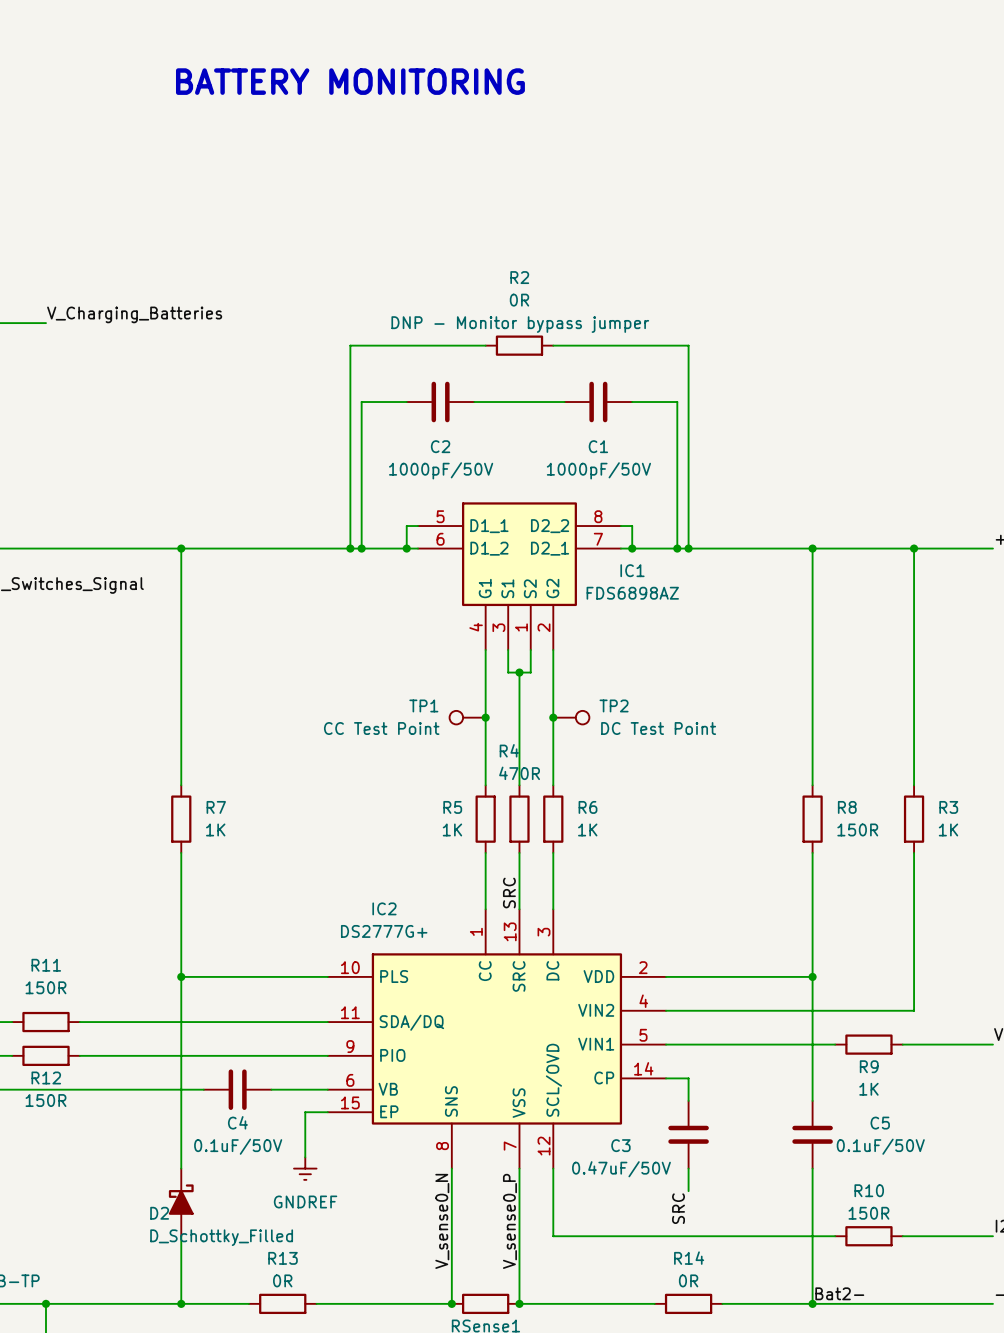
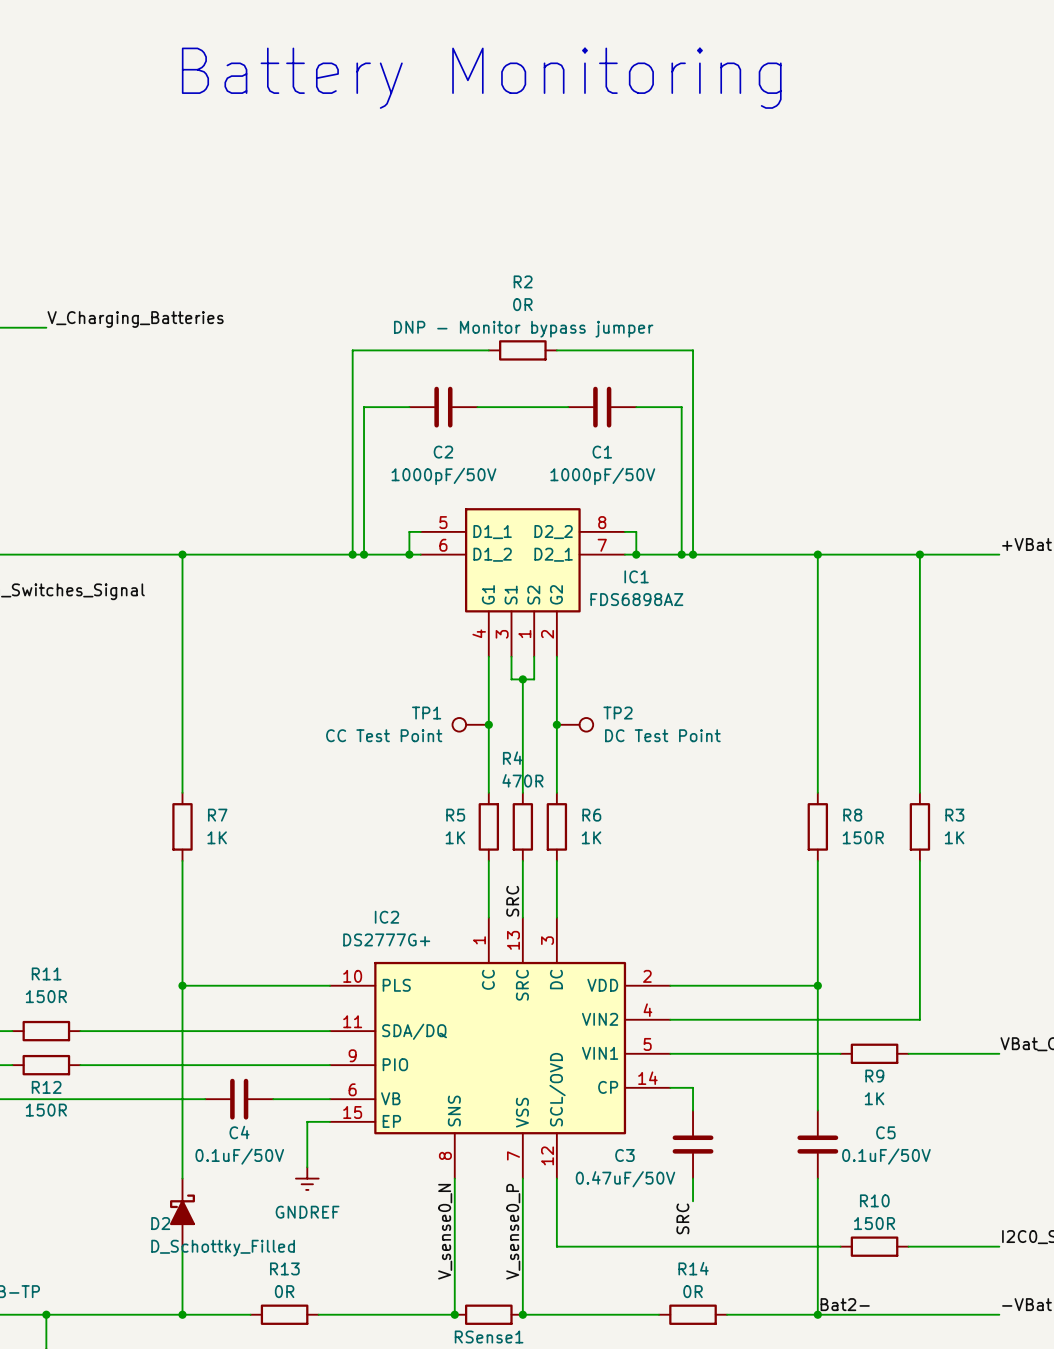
text: BATTERY MONITORING (350, 81) -> Battery Monitoring (481, 78)

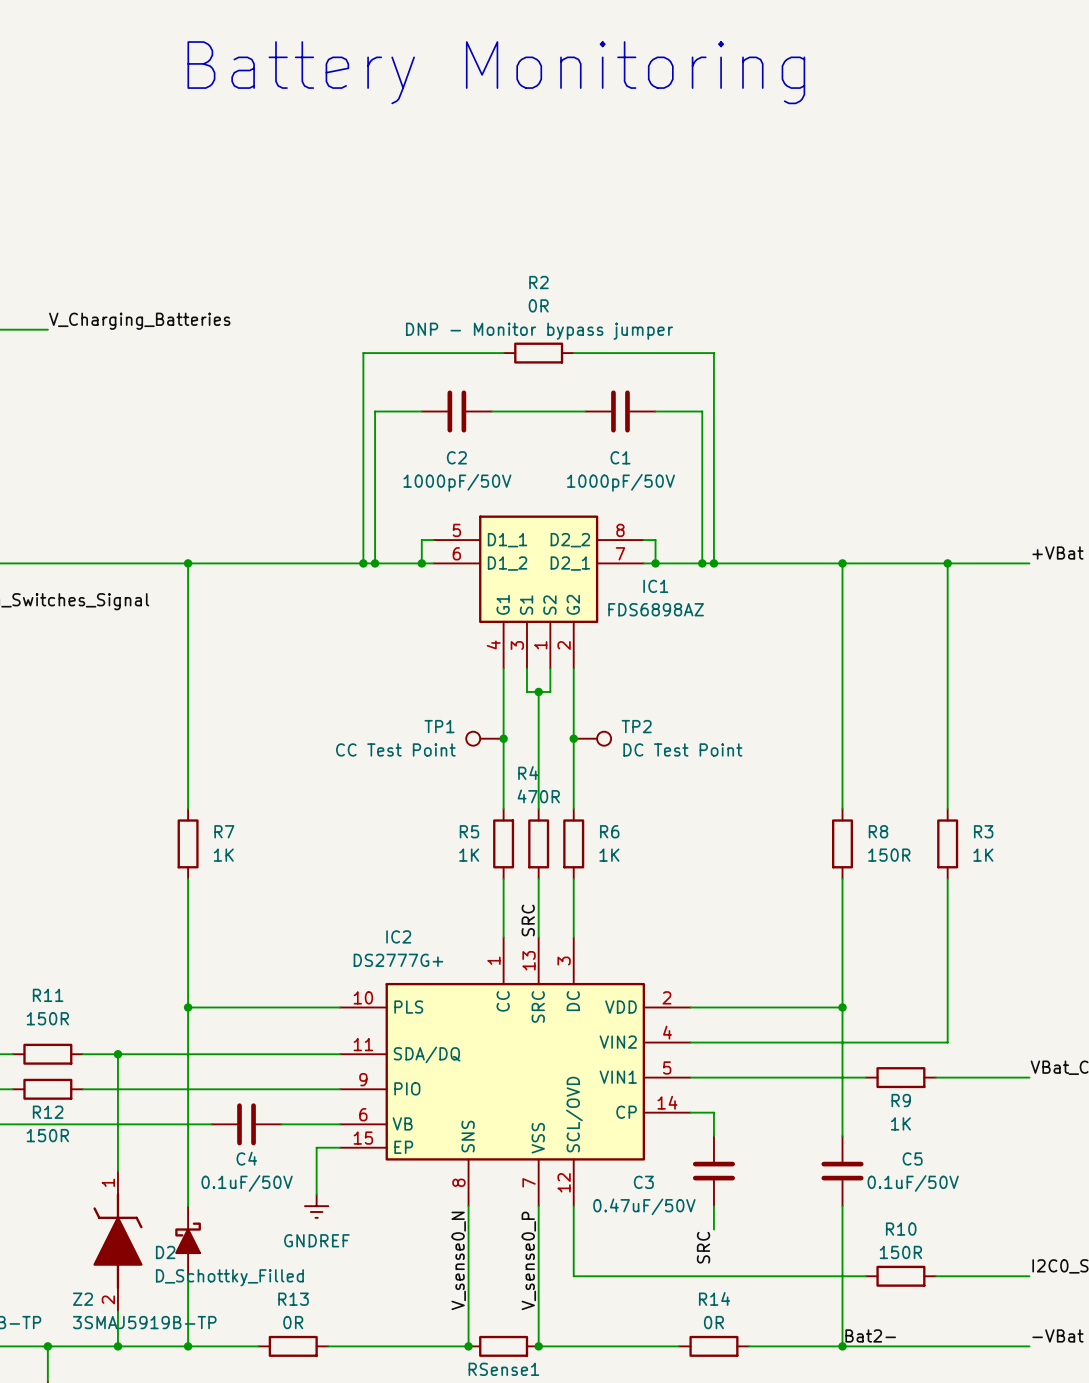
wire: none -> (117, 1054) (117, 1171)
junction: none -> (117, 1054)
Z2: none -> 3SMAJ5919B-TP (117, 1241)
wire: none -> (117, 1311) (117, 1346)
junction: none -> (117, 1346)

